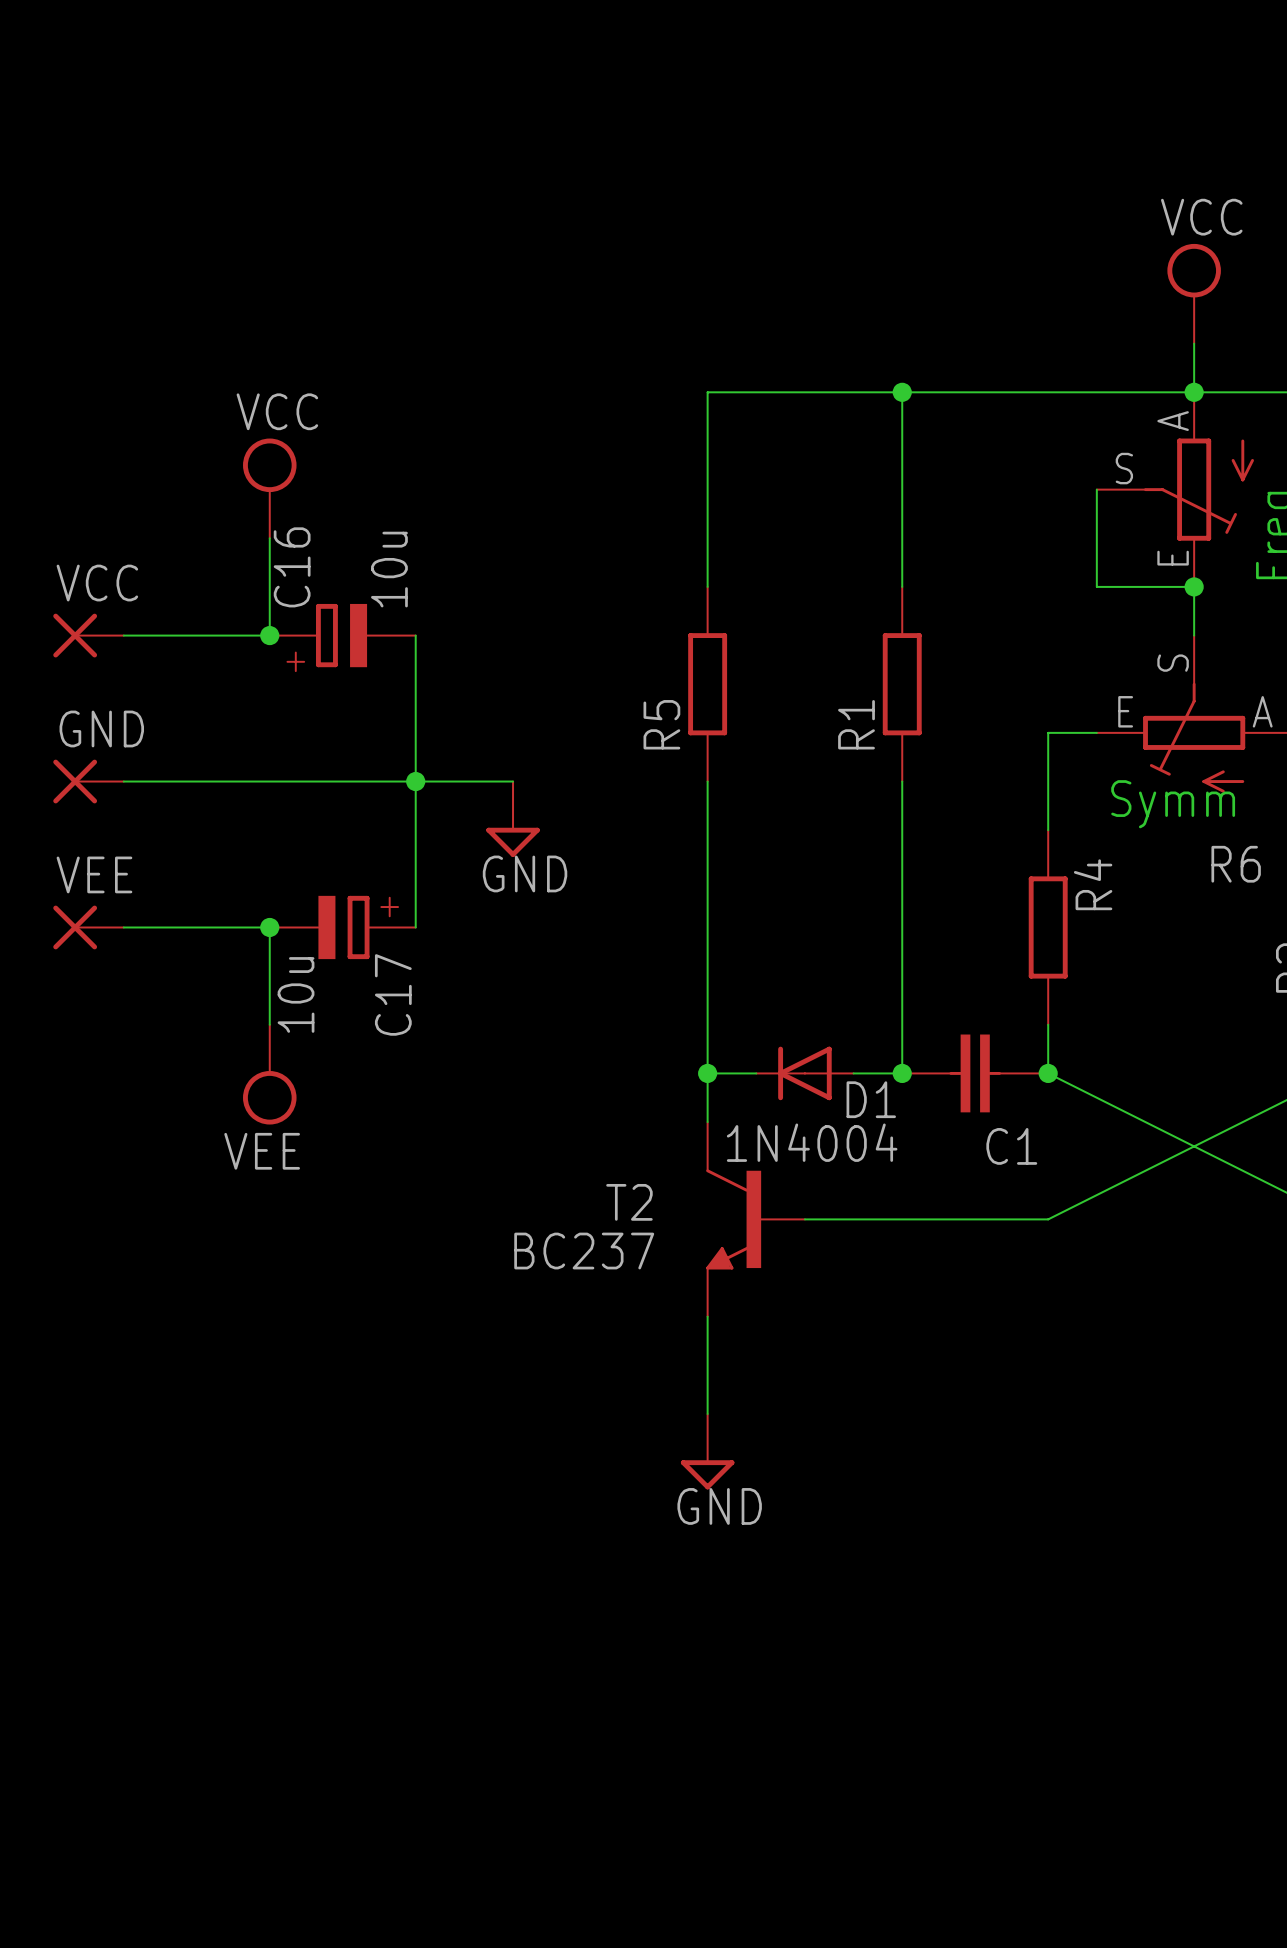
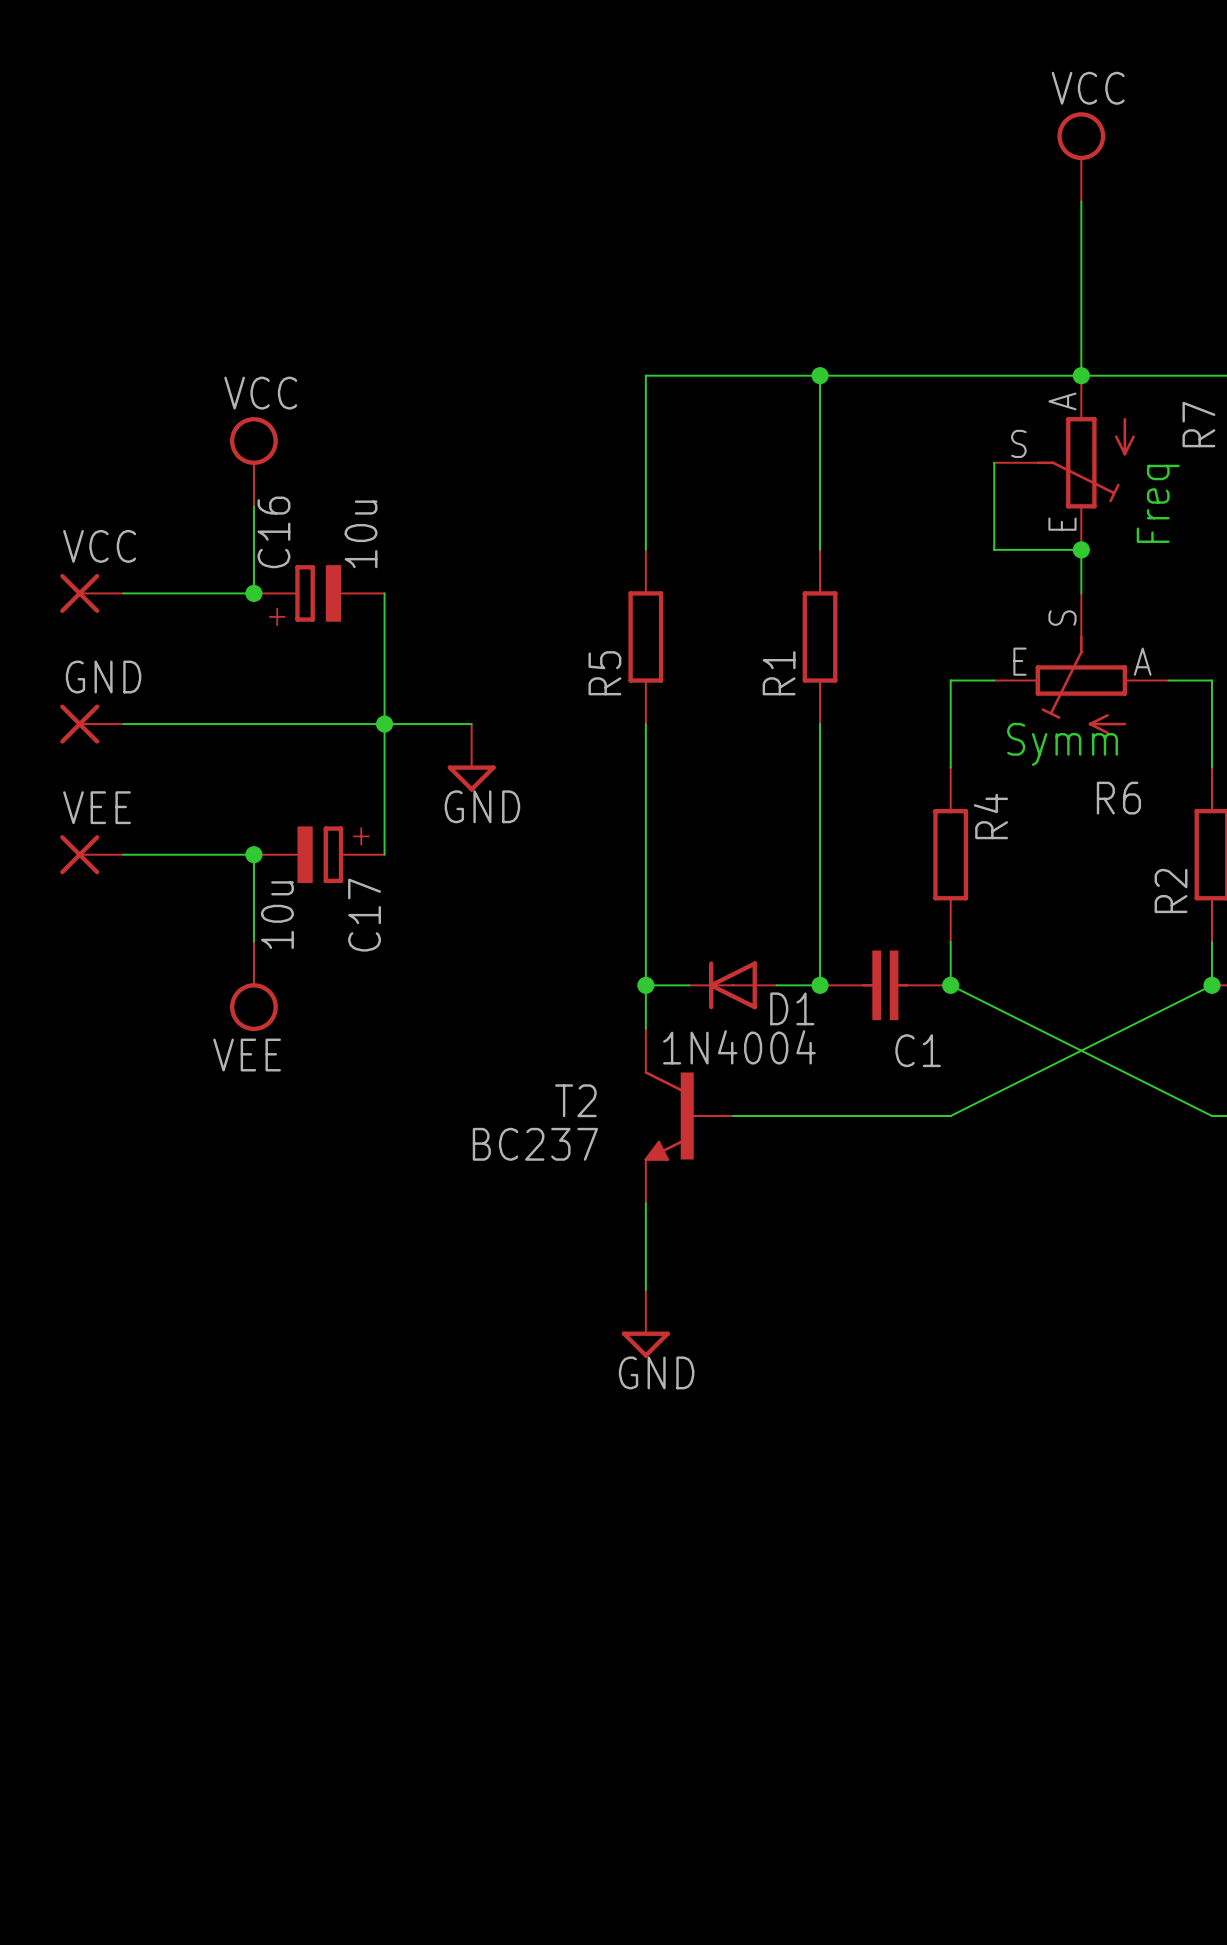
wire: none -> (1081, 201) (1081, 332)
power symbol position: VCC (1194, 293) -> VCC (1081, 156)

